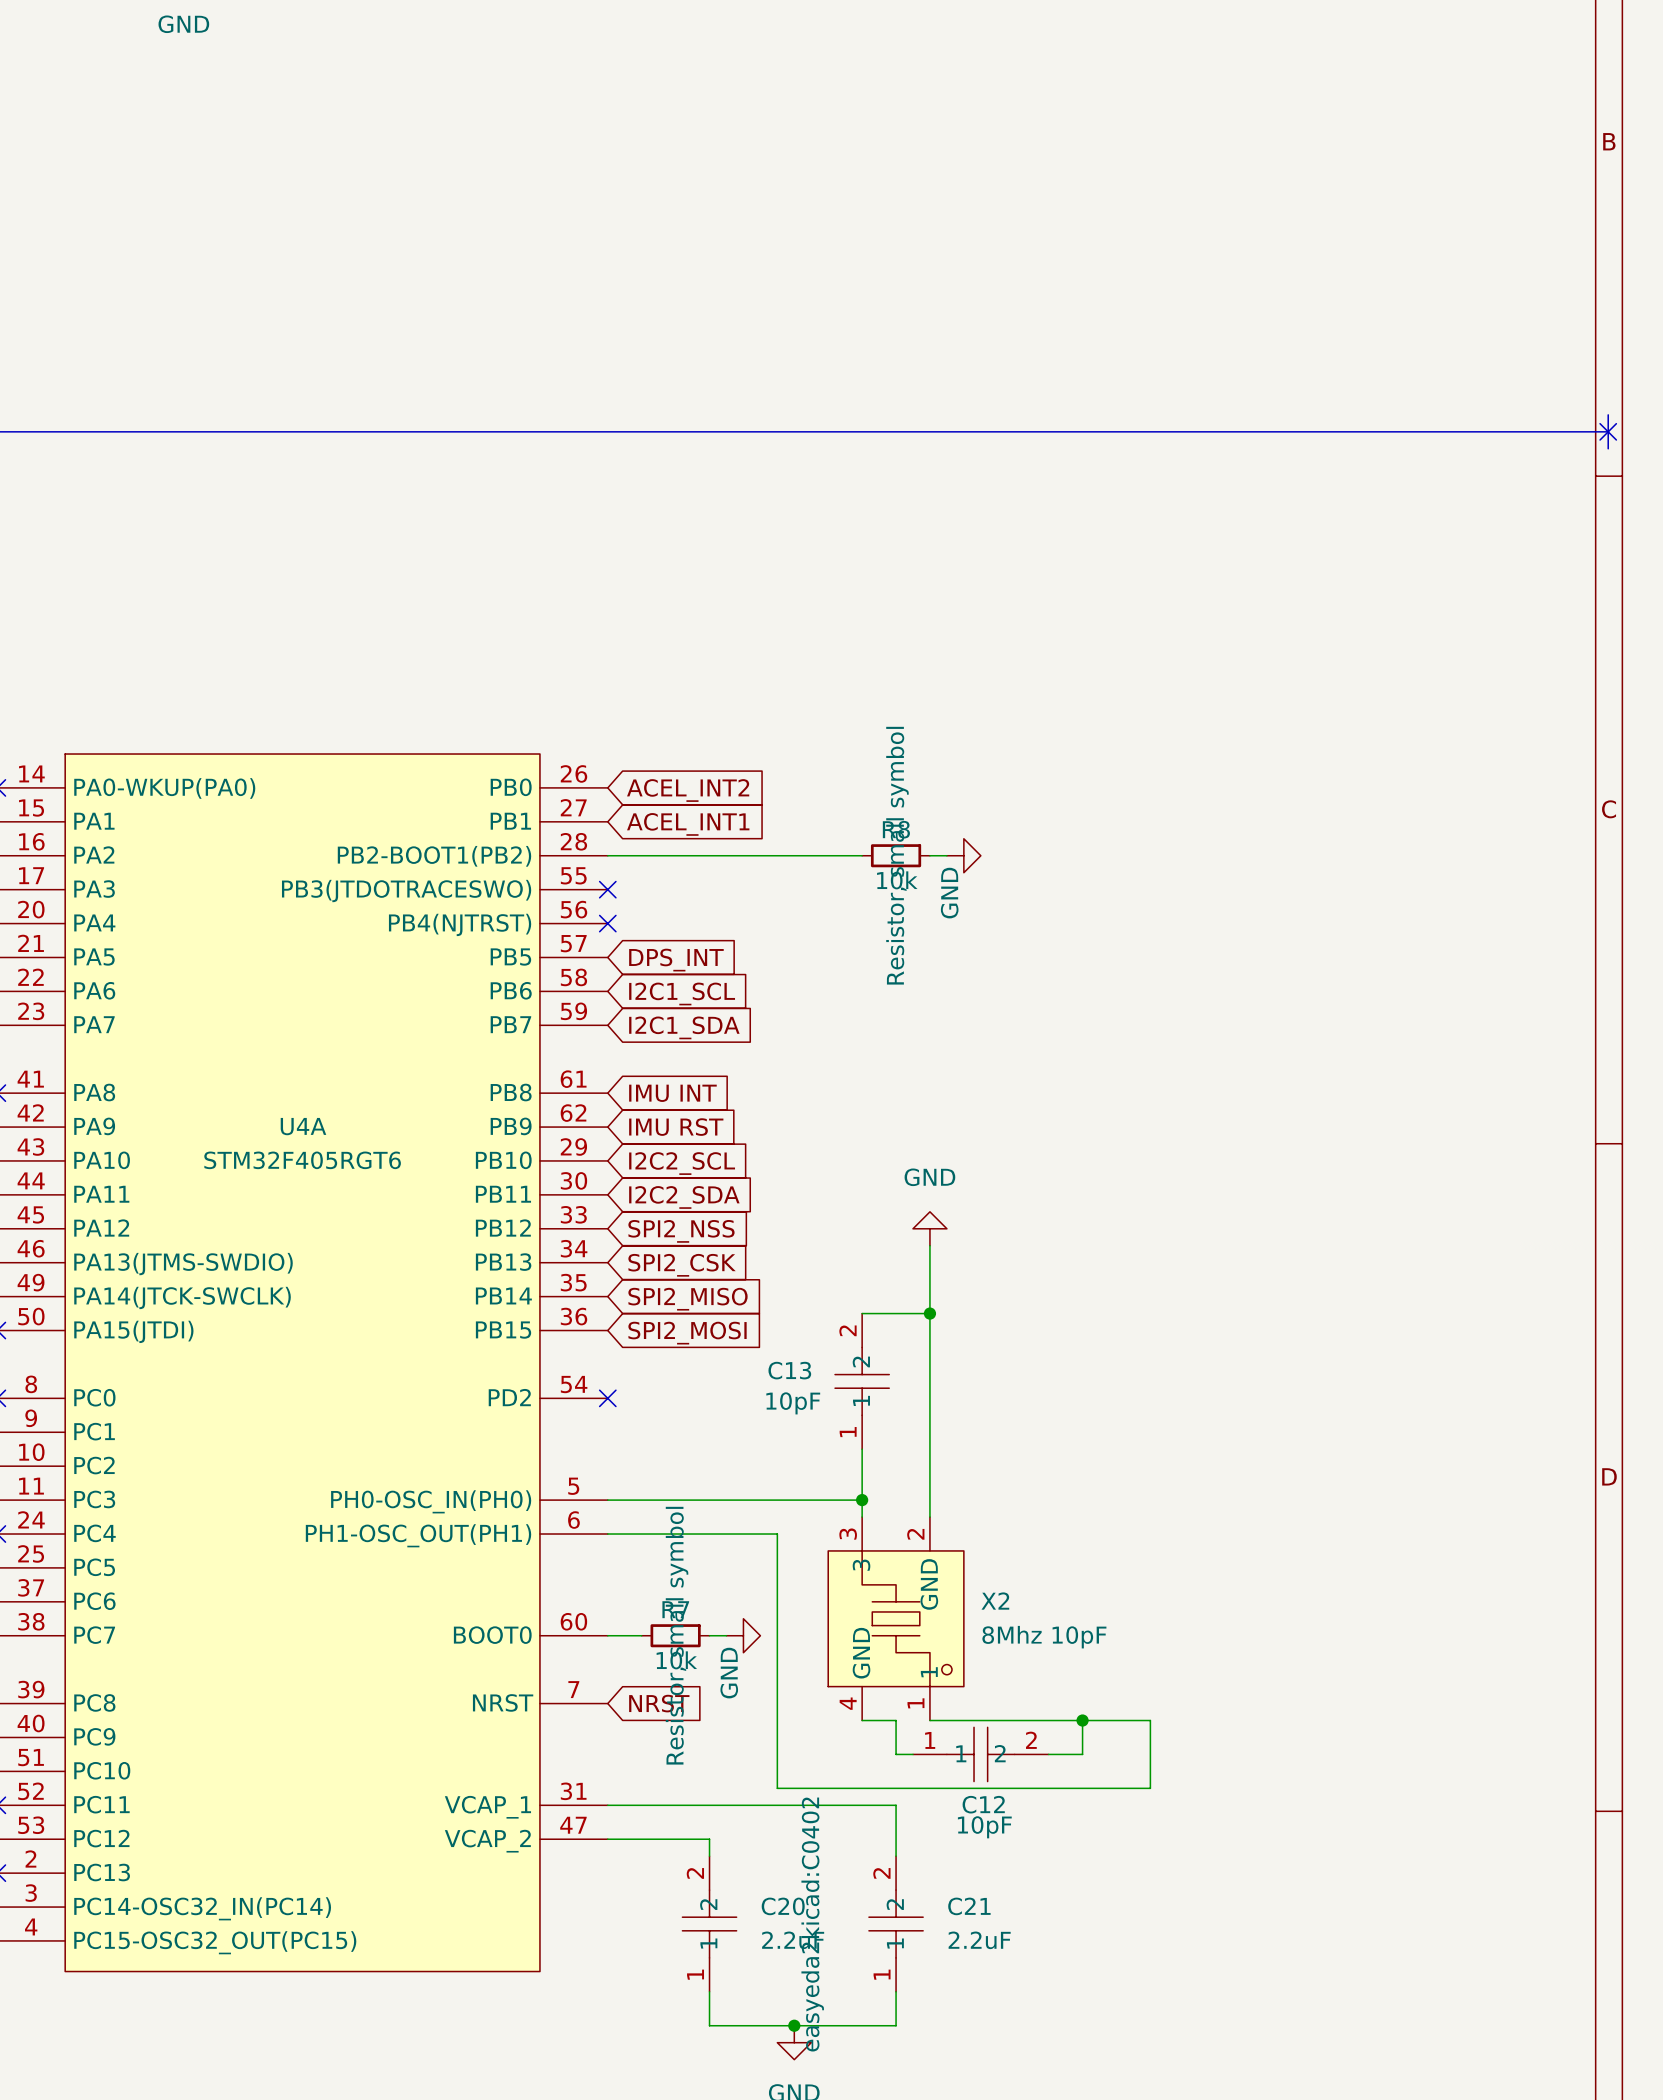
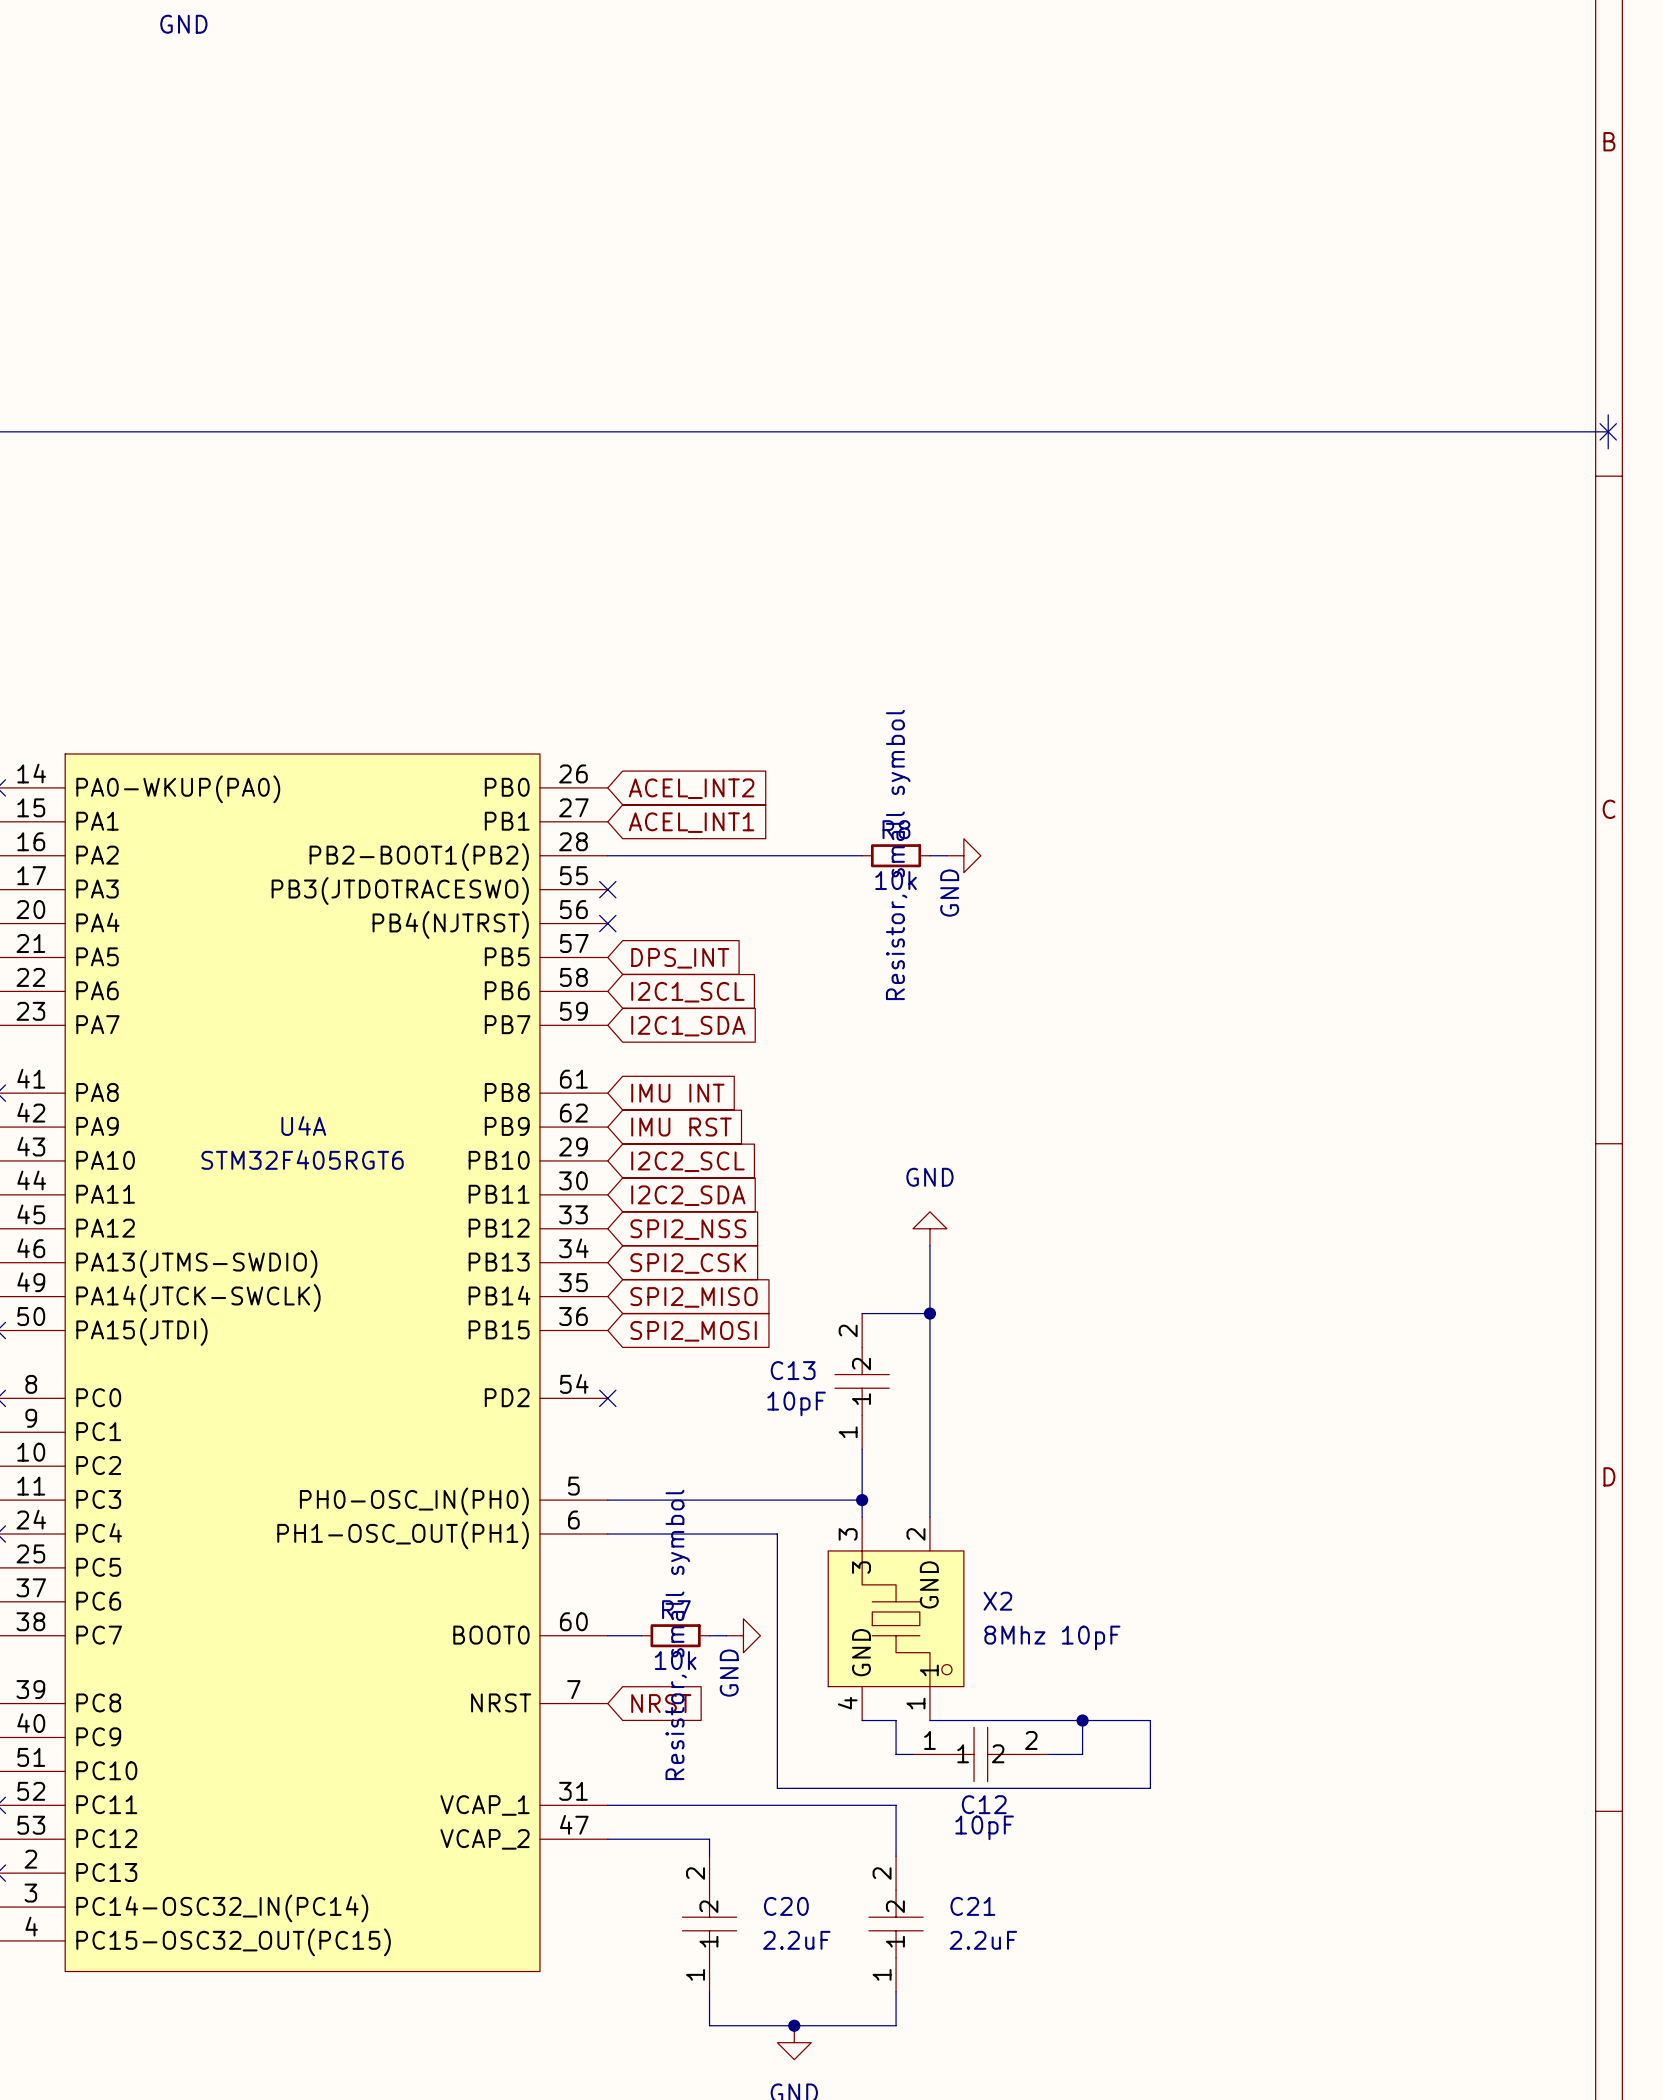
C20 text: easyeda2kicad:C0402 (812, 1924) -> none

